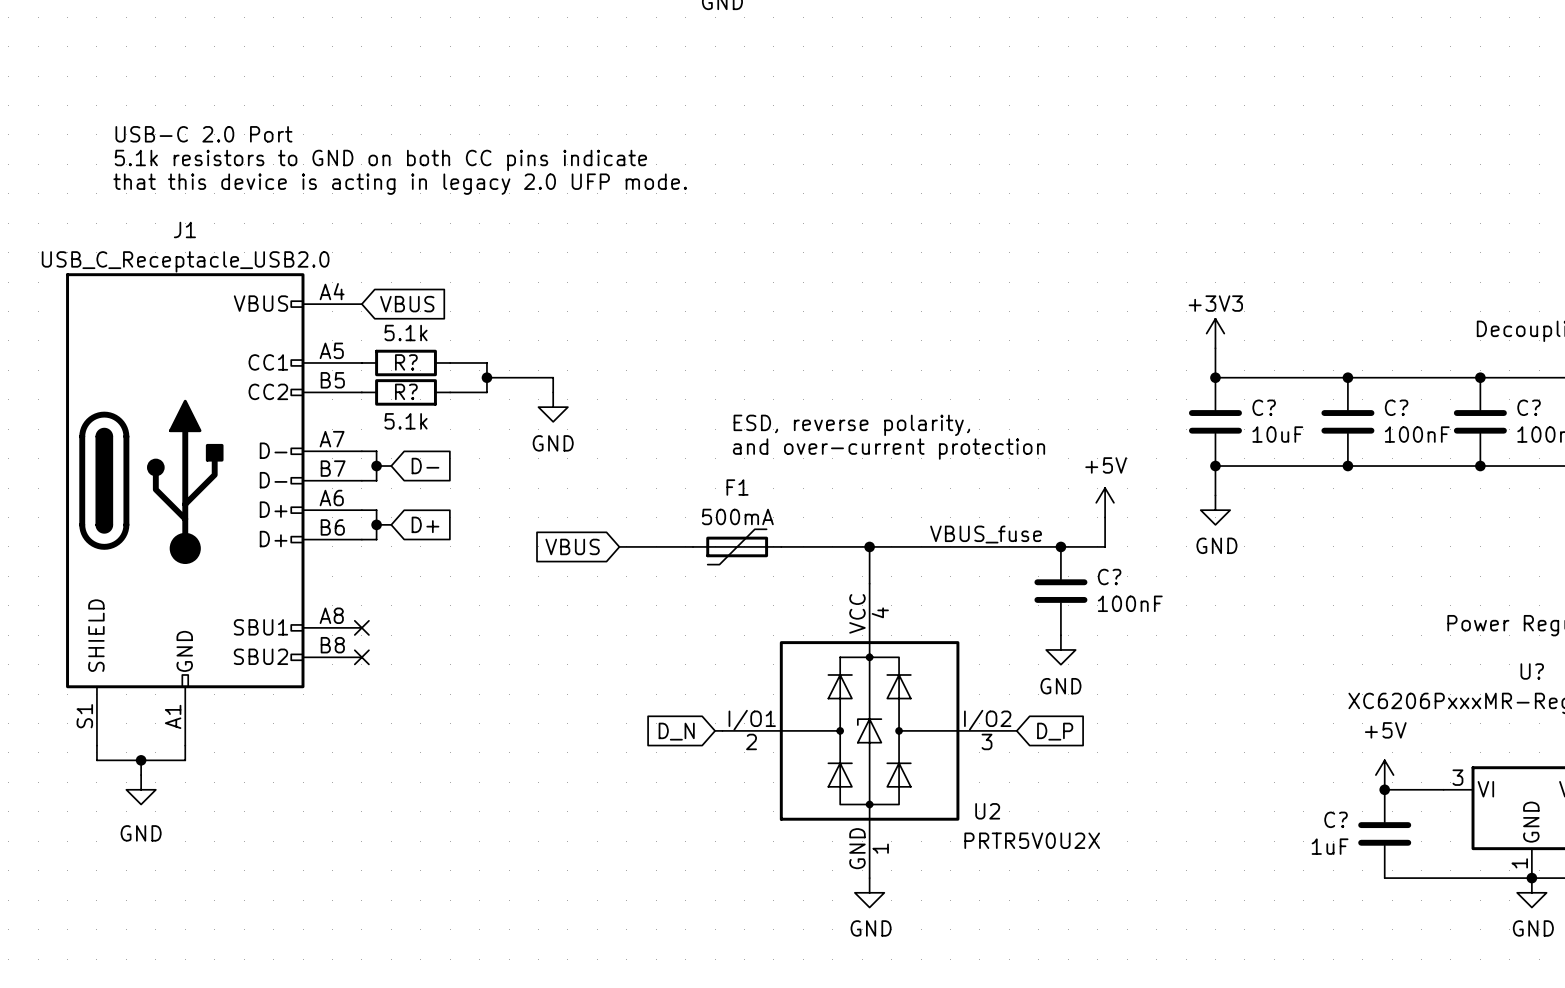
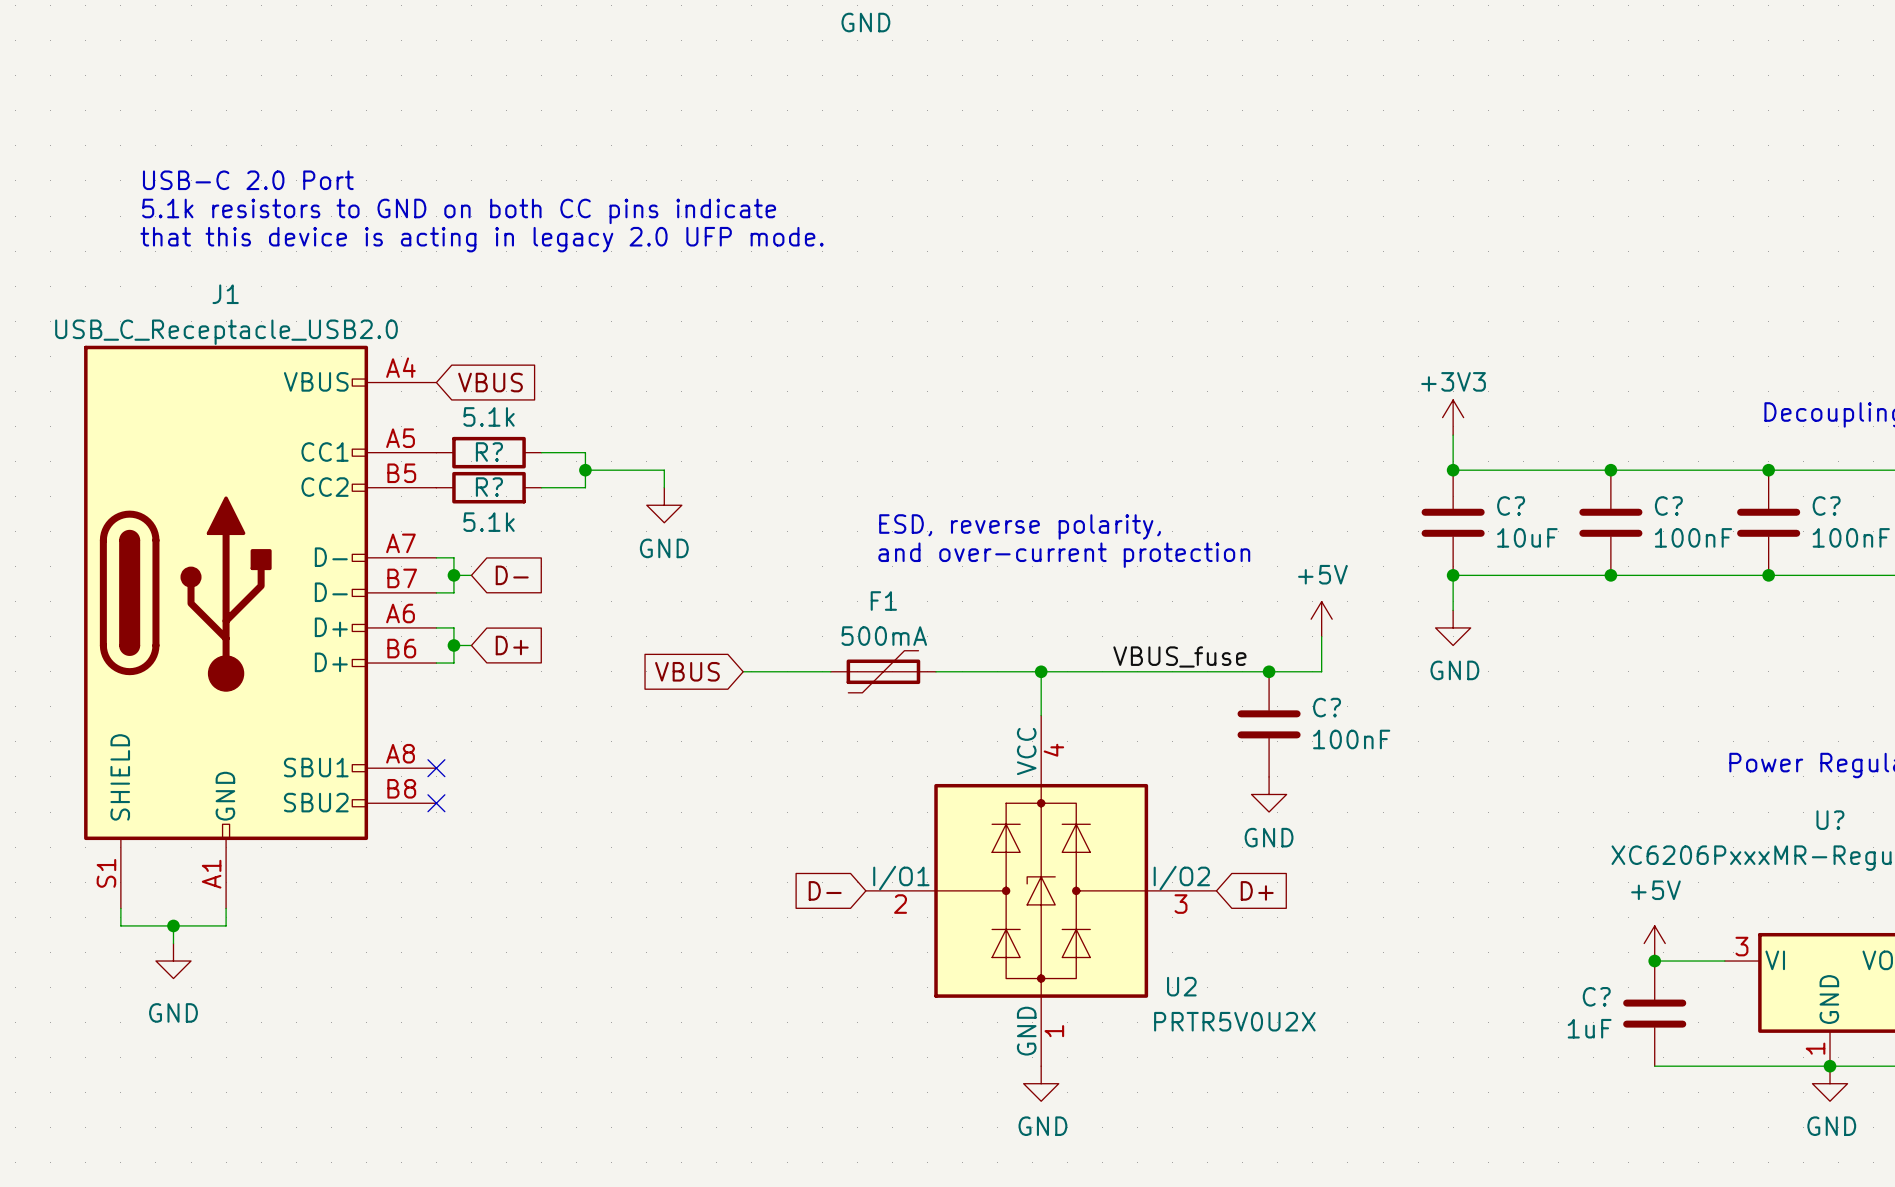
wire: (715, 730) (722, 730) -> none
global label: D_N (676, 731) -> D- (825, 890)
global label: D_P (1055, 731) -> D+ (1257, 890)

